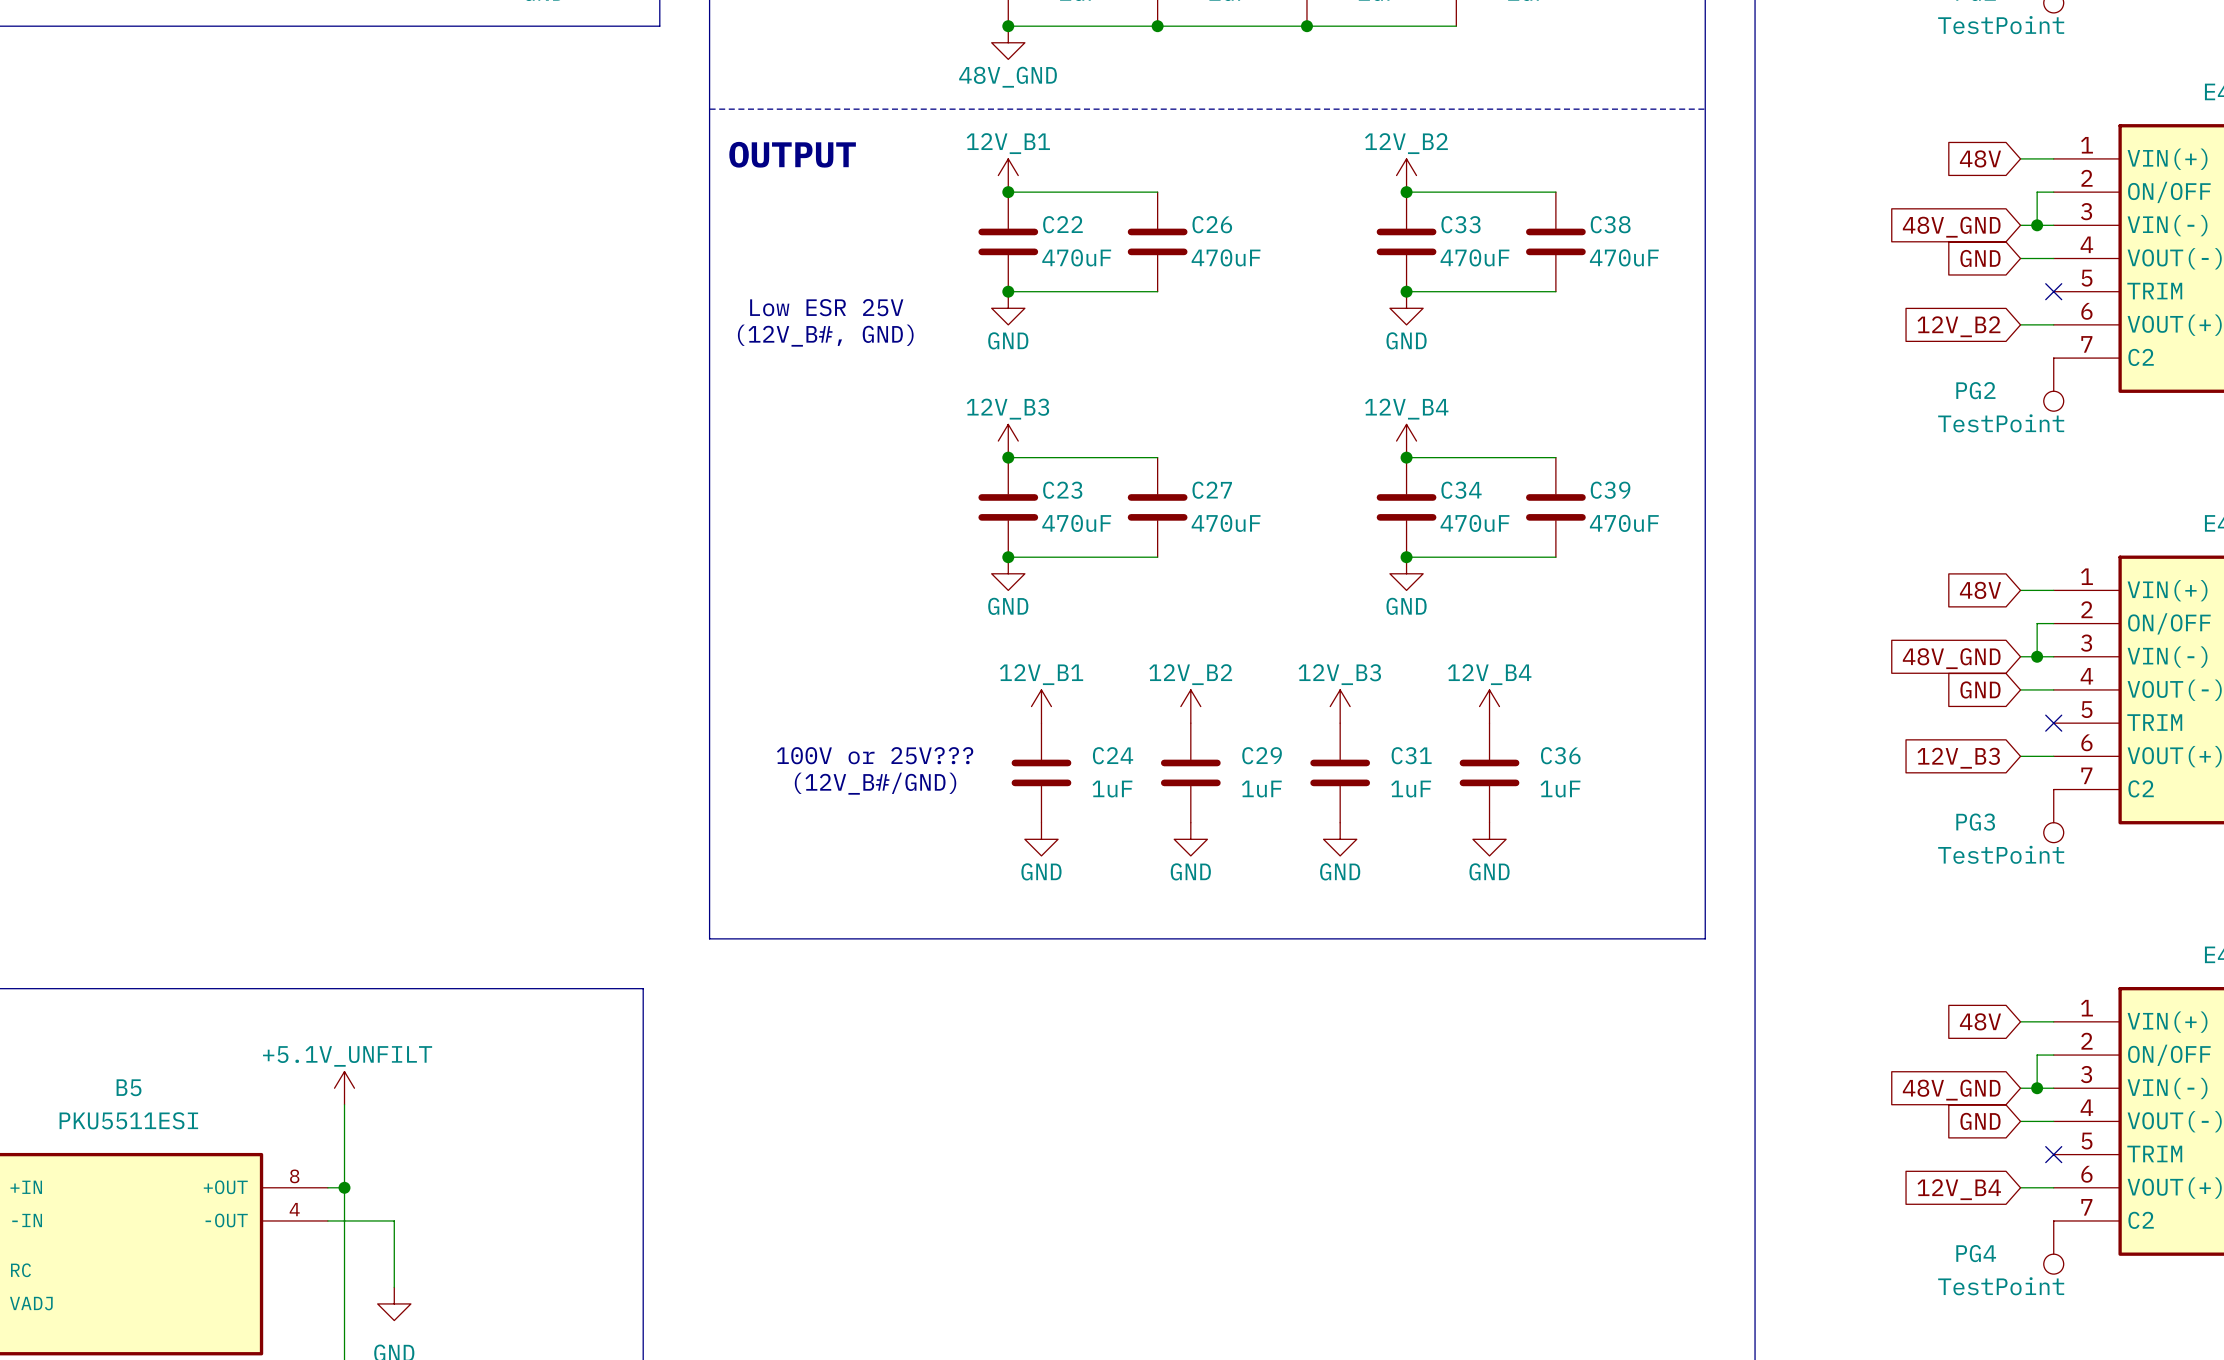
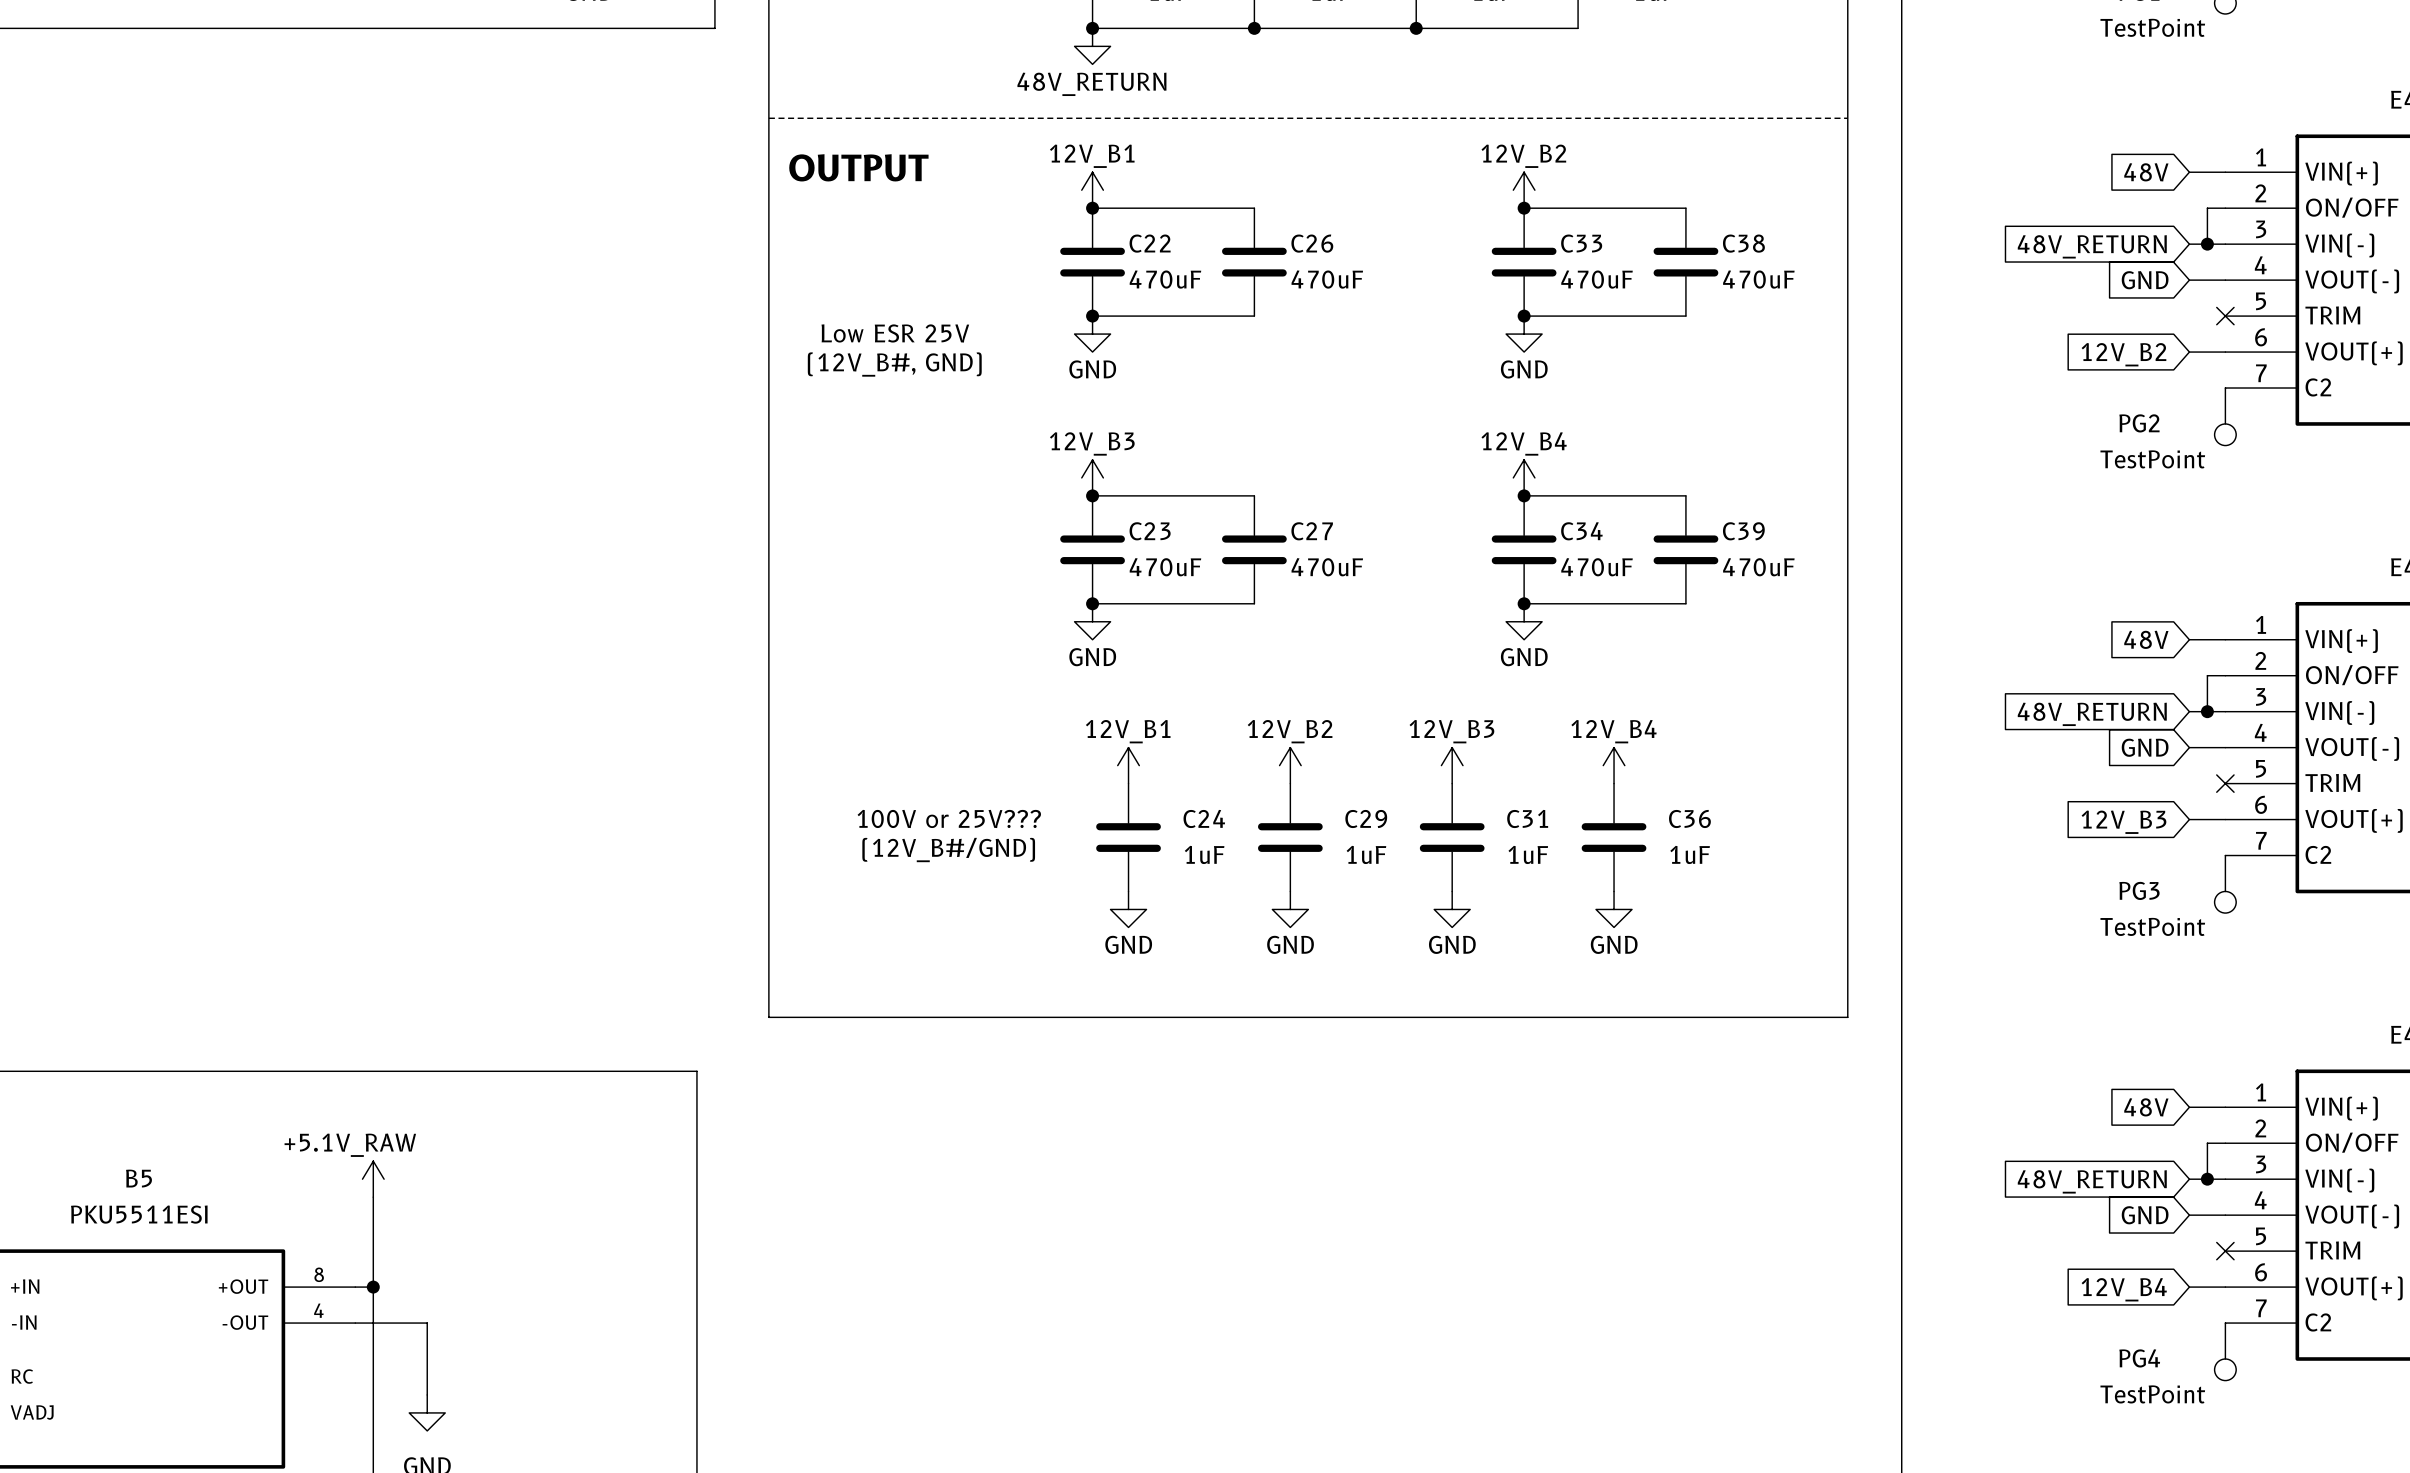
power symbol: 48V_GND (1008, 42) -> 48V_RETURN (1092, 46)
global label: 48V_GND (1951, 227) -> 48V_RETURN (2092, 246)
global label: 48V_GND (1951, 658) -> 48V_RETURN (2092, 714)
power symbol: +5.1V_UNFILT (344, 1088) -> +5.1V_RAW (373, 1179)
global label: 48V_GND (1951, 1090) -> 48V_RETURN (2092, 1181)

